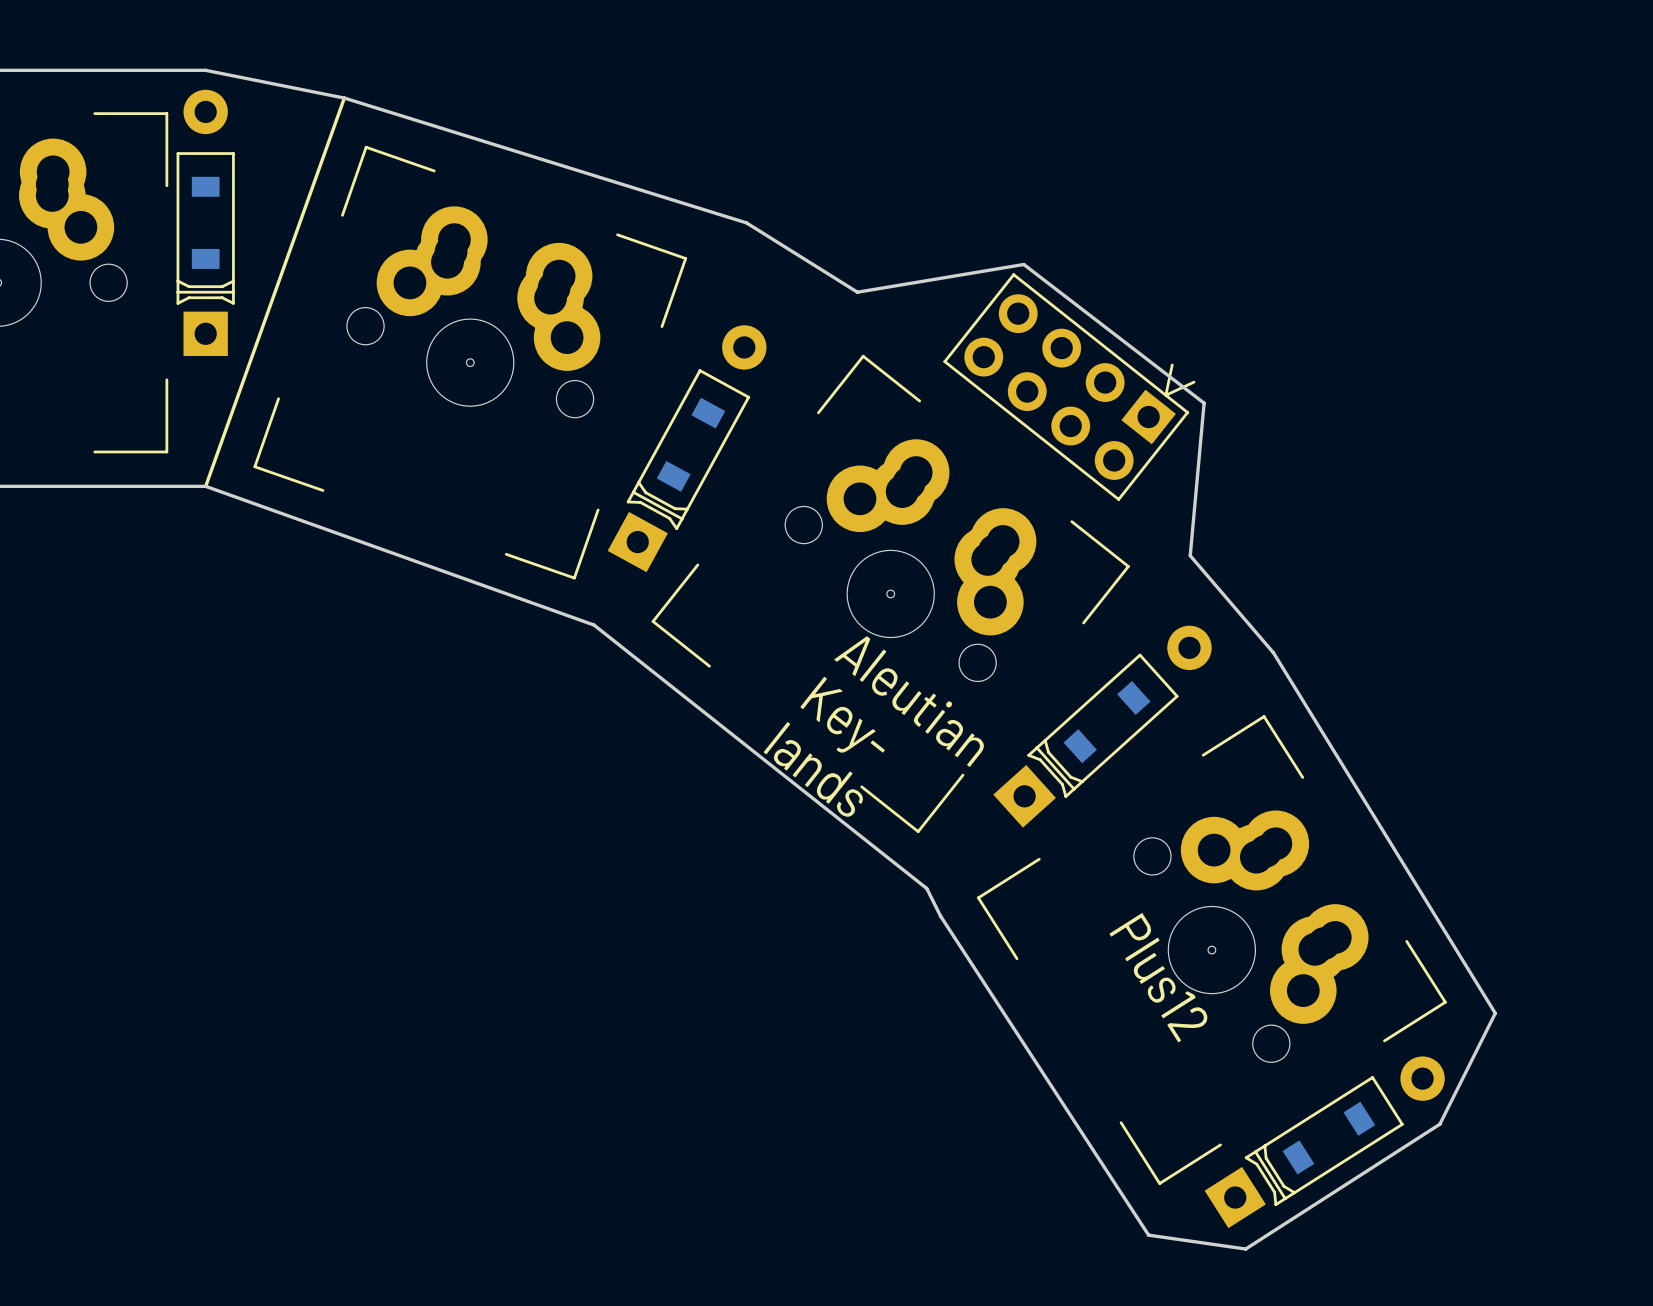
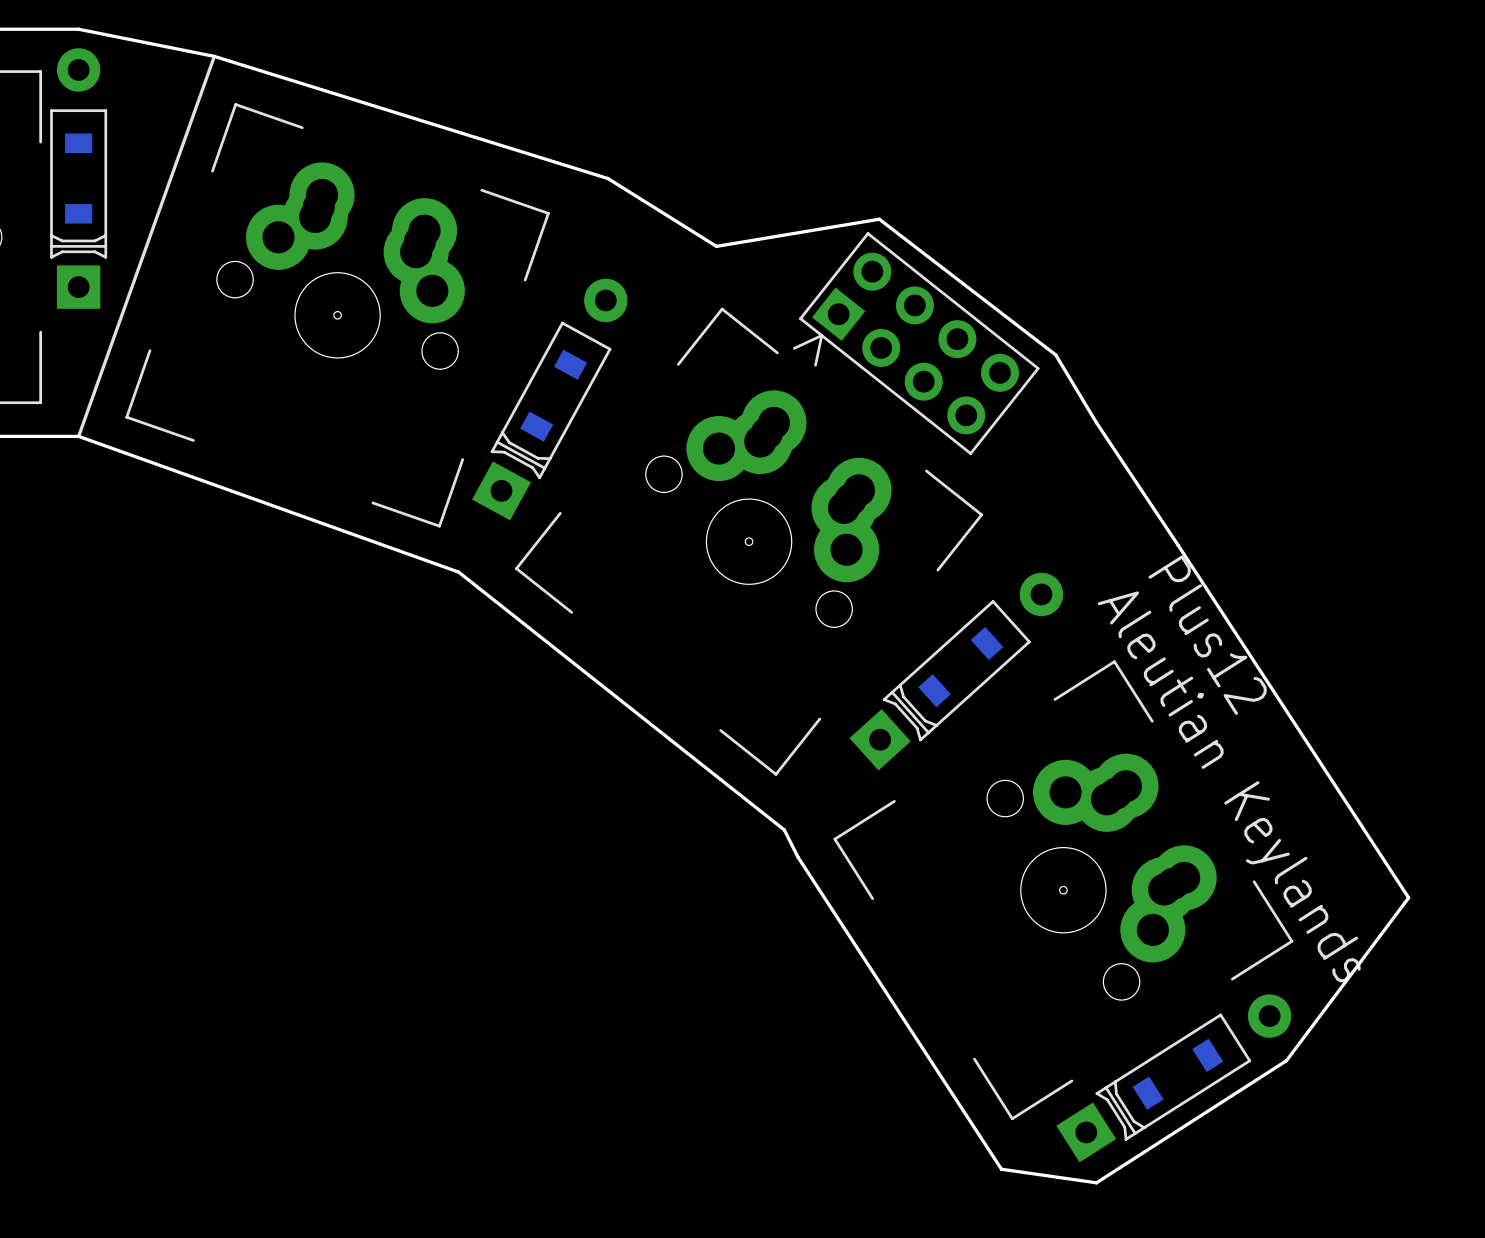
part rotation: 0° (1069, 387) -> 180° (916, 343)
board edge: (1204, 403) (1190, 555) (1273, 652) (1495, 1013) (1439, 1124) -> (1055, 354) (1096, 422) (1408, 897) (1286, 1060)
text: Aleutian (909, 701) -> none
text: Key- (842, 714) -> none
text: lands (813, 769) -> none
text: none -> Aleutian Keylands (1229, 786)
text position: Plus12 (1158, 977) -> Plus12 (1207, 635)

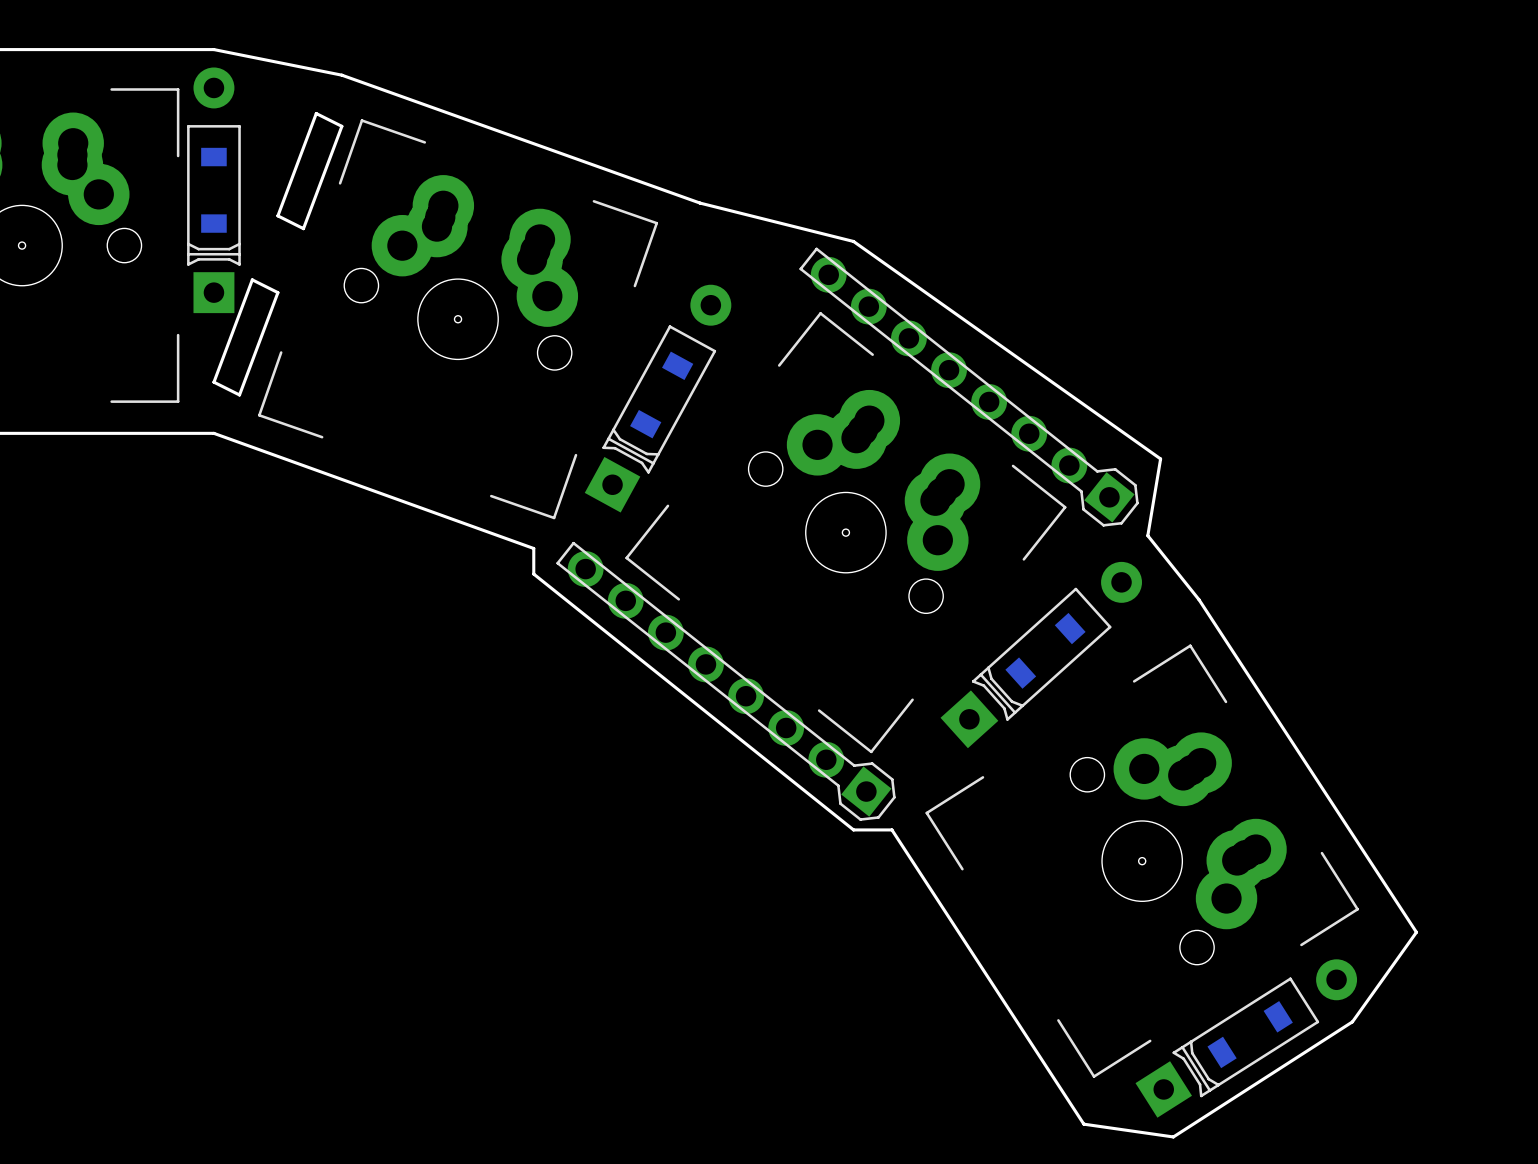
board edge: (214, 56) (607, 178) (716, 246) (879, 219) (1055, 354) (1096, 422) (1408, 897) (1286, 1060) -> (341, 75) (700, 203) (853, 241) (1160, 458) (1147, 535) (1198, 599) (1416, 932) (1352, 1021)
line: (214, 56) (78, 436) -> none
board edge: none -> (316, 113) (341, 126) (303, 228) (277, 215) (316, 113)
board edge: none -> (252, 279) (213, 382) (239, 394) (277, 292) (252, 279)
part: (916, 343) -> none
part: none -> (969, 387)
board edge: (78, 436) (458, 572) (784, 829) (797, 857) -> (213, 433) (533, 548) (533, 574) (853, 829) (891, 829)
text: Plus12 (1207, 635) -> none
part: none -> (726, 681)
text: Aleutian Keylands (1229, 786) -> none

